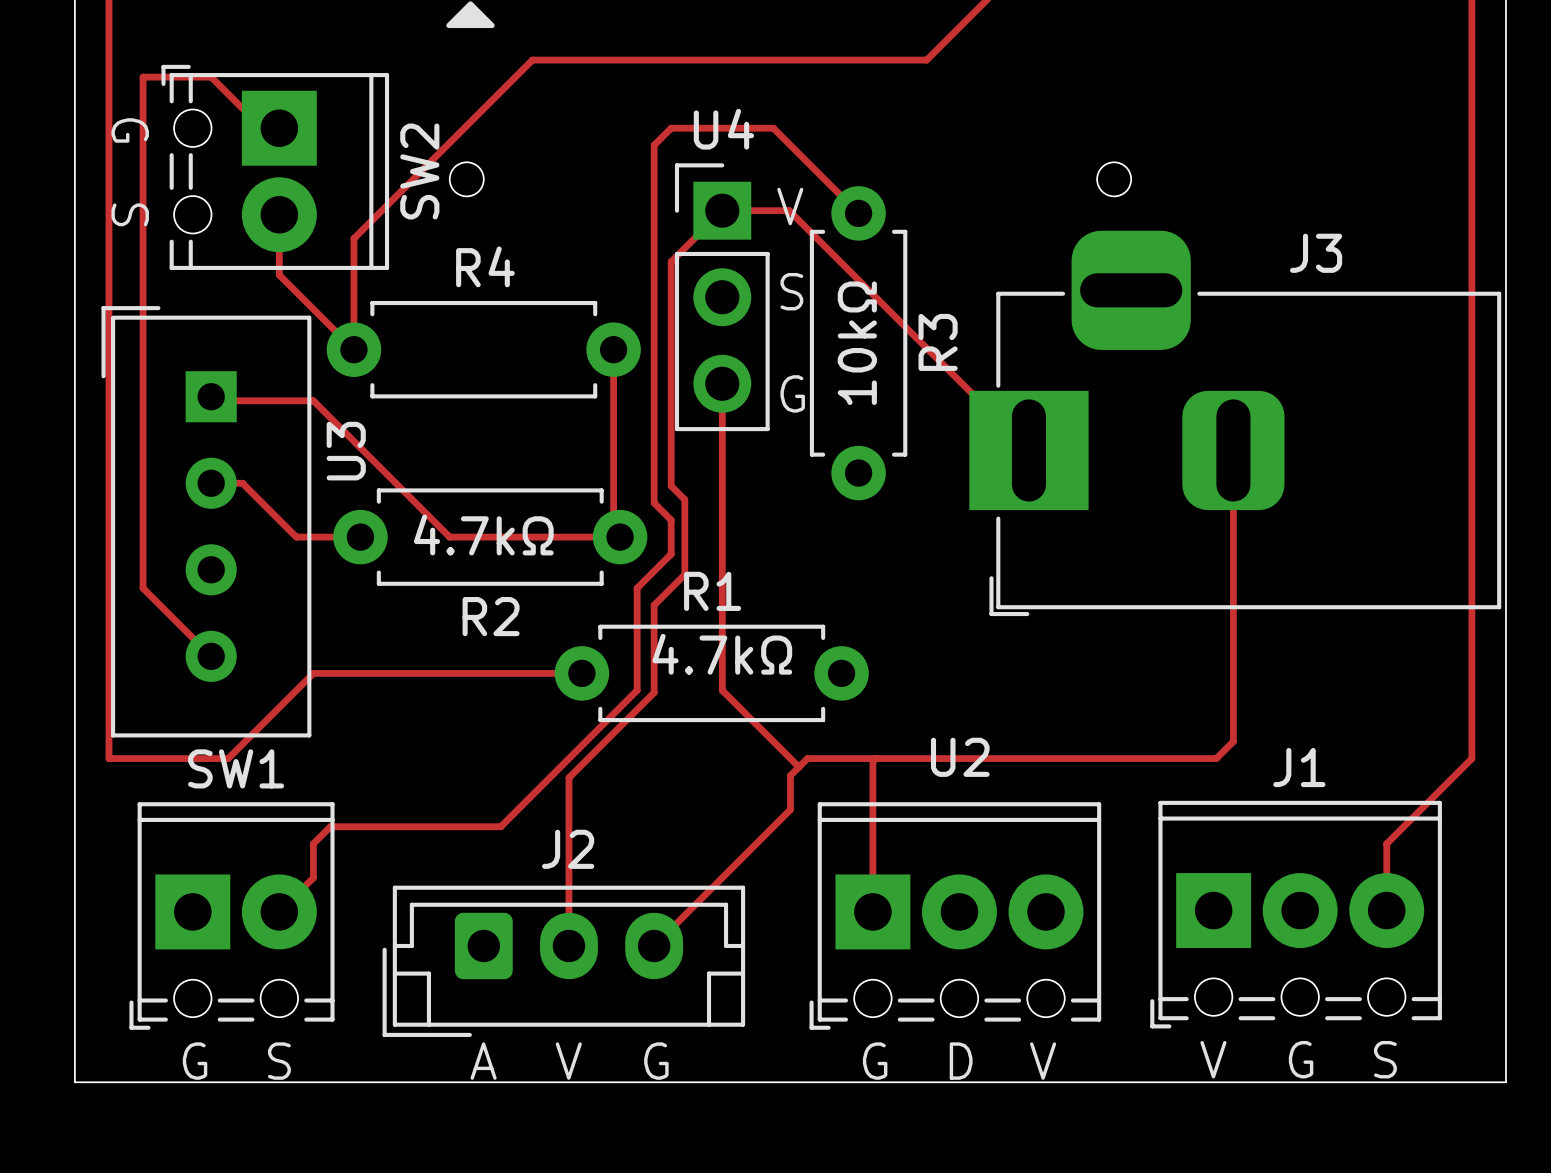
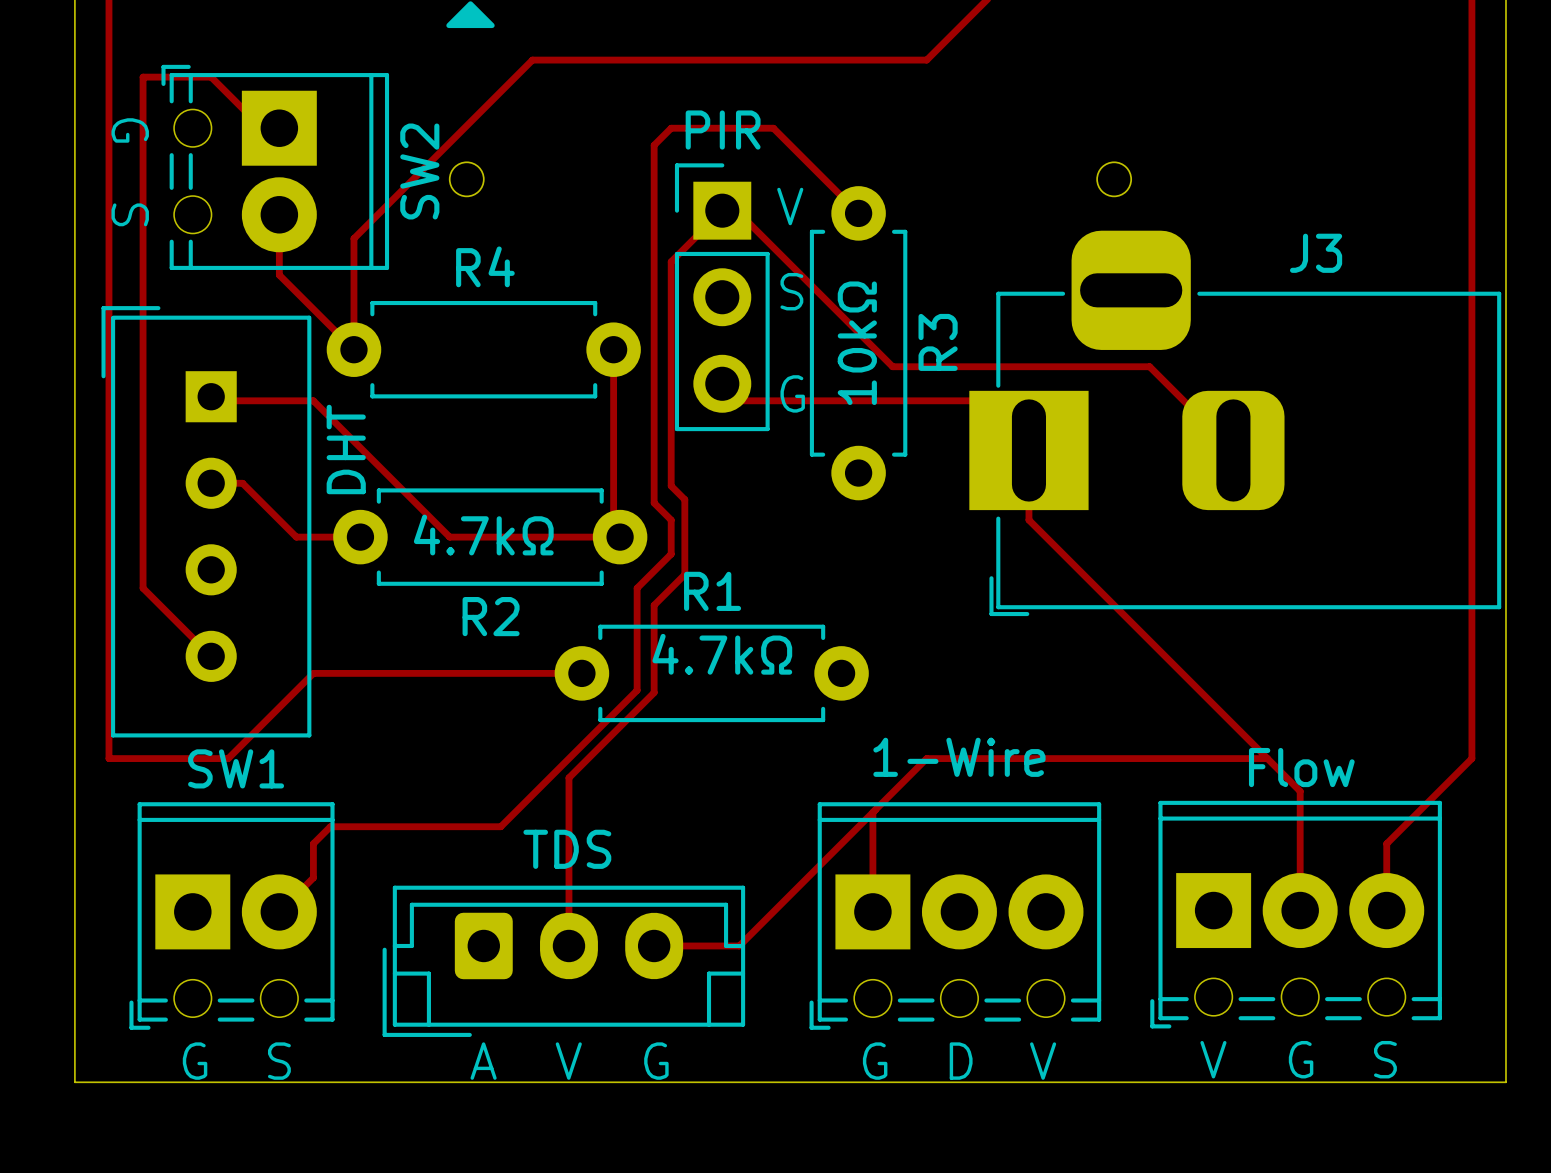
U4 name: U4 (723, 129) -> PIR (723, 130)
track: (736, 210) (789, 210) (979, 400) -> (722, 383) (739, 400) (979, 400)
track: none -> (736, 210) (892, 366) (1149, 366) (1233, 450)
track: (722, 383) (722, 690) (798, 767) -> none
track: none -> (1028, 450) (1028, 520) (1300, 791) (1300, 910)
track: (1233, 450) (1233, 741) (1216, 758) -> (1267, 758) (1216, 758)
U3 name: U3 (346, 451) -> DHT (346, 449)
U2 name: U2 (960, 757) -> 1-Wire (959, 757)
track: (875, 758) (872, 761) (872, 812) -> none
track: (926, 758) (807, 758) (790, 775) (790, 809) (654, 945) -> (926, 758) (739, 945) (654, 945)
J1 name: J1 (1299, 767) -> Flow (1301, 767)
J2 name: J2 (568, 849) -> TDS (567, 849)

